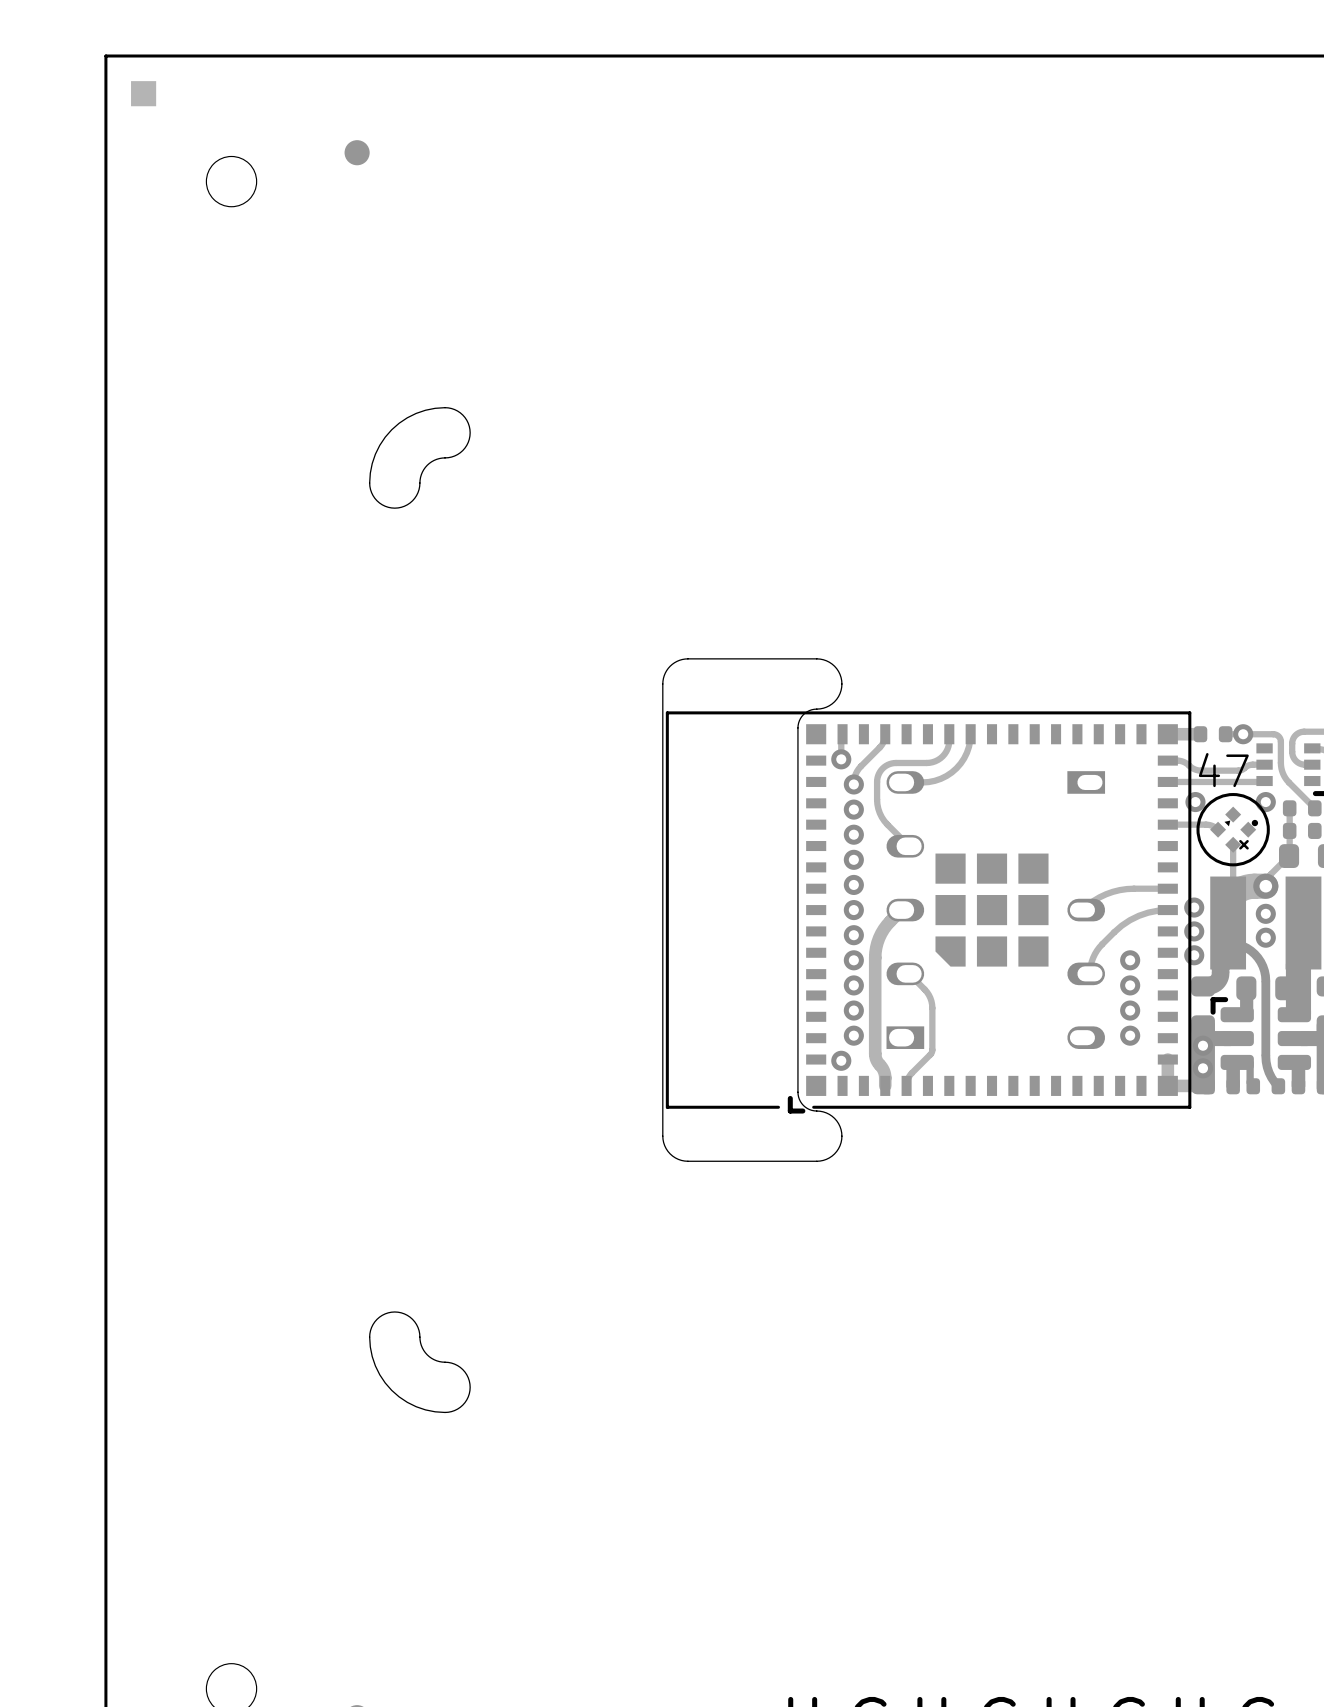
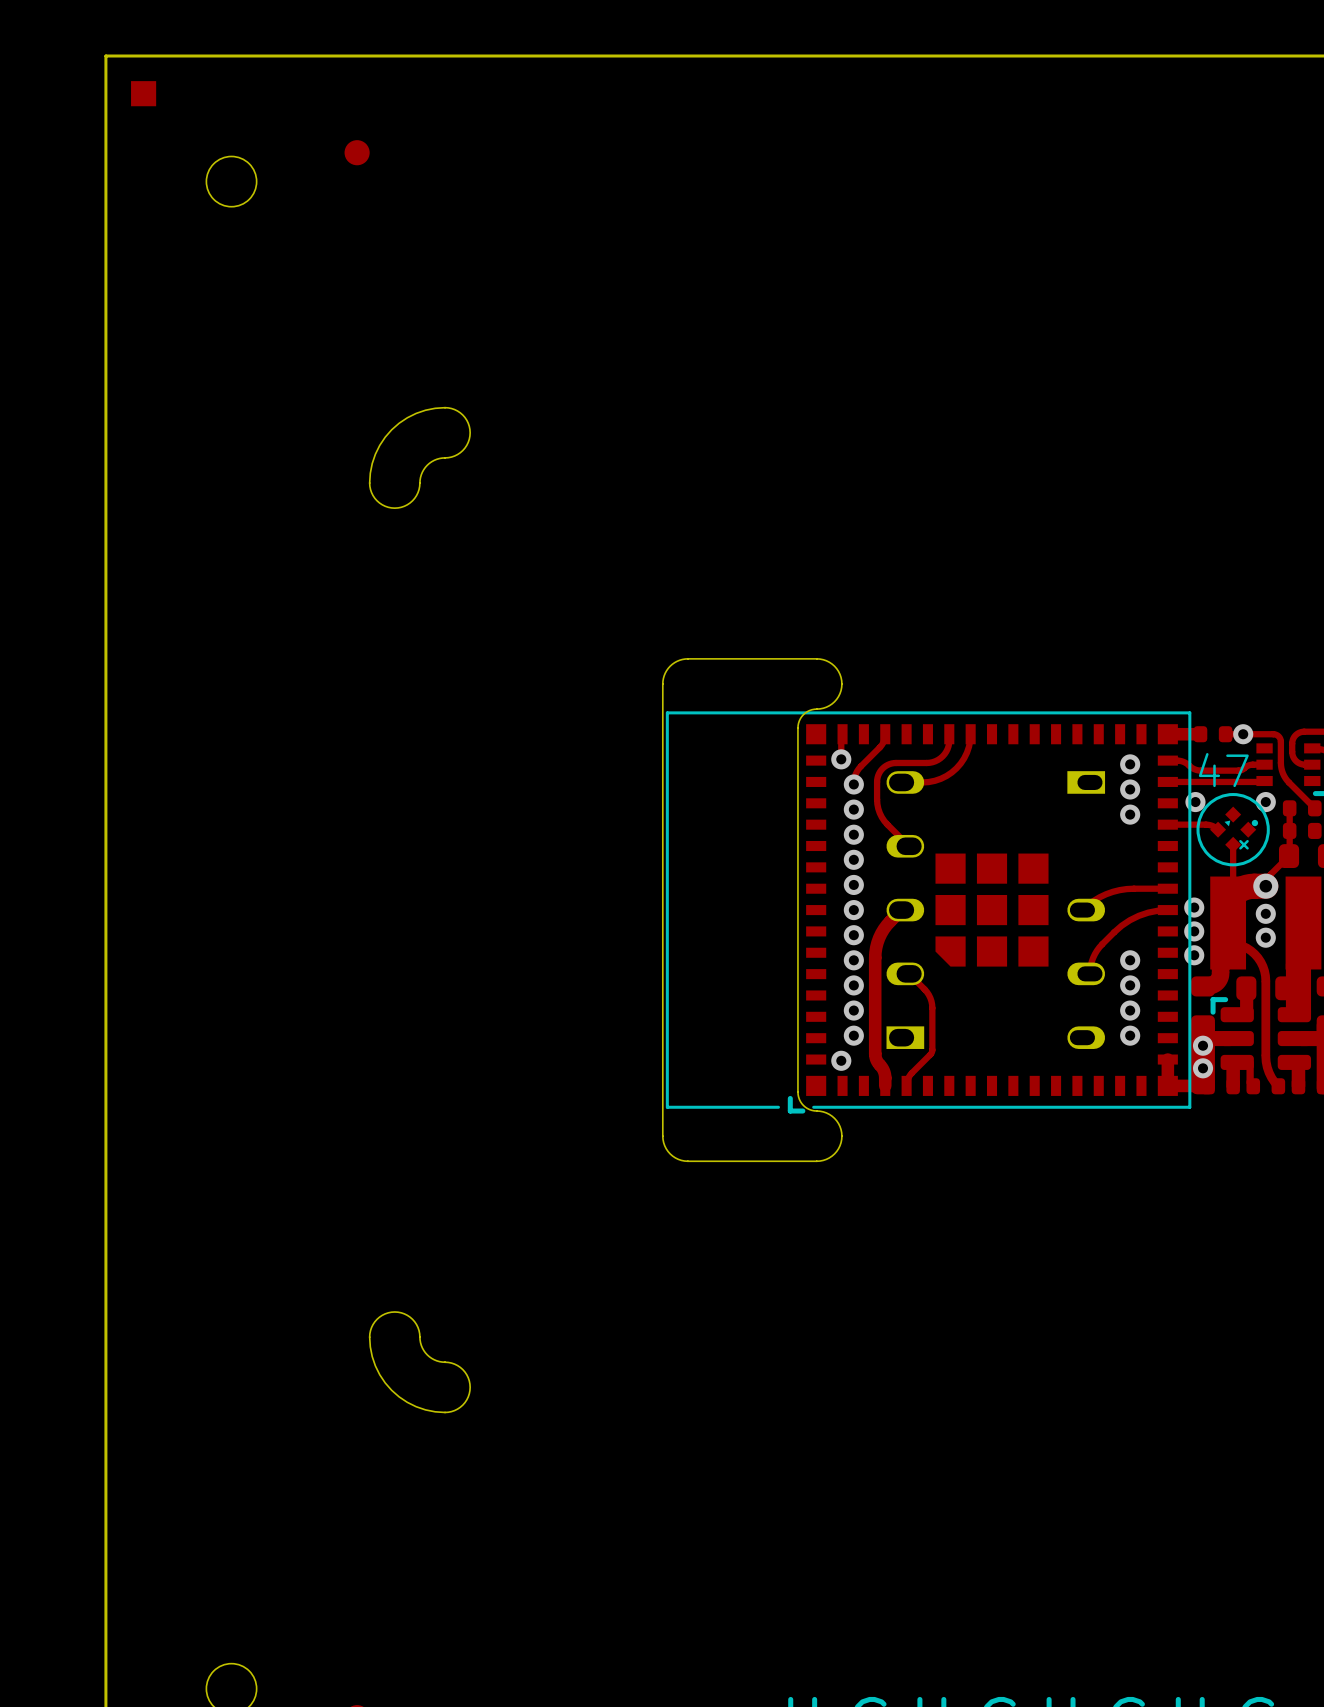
via: none -> (1130, 764)
via: none -> (1130, 789)
via: none -> (1130, 814)

